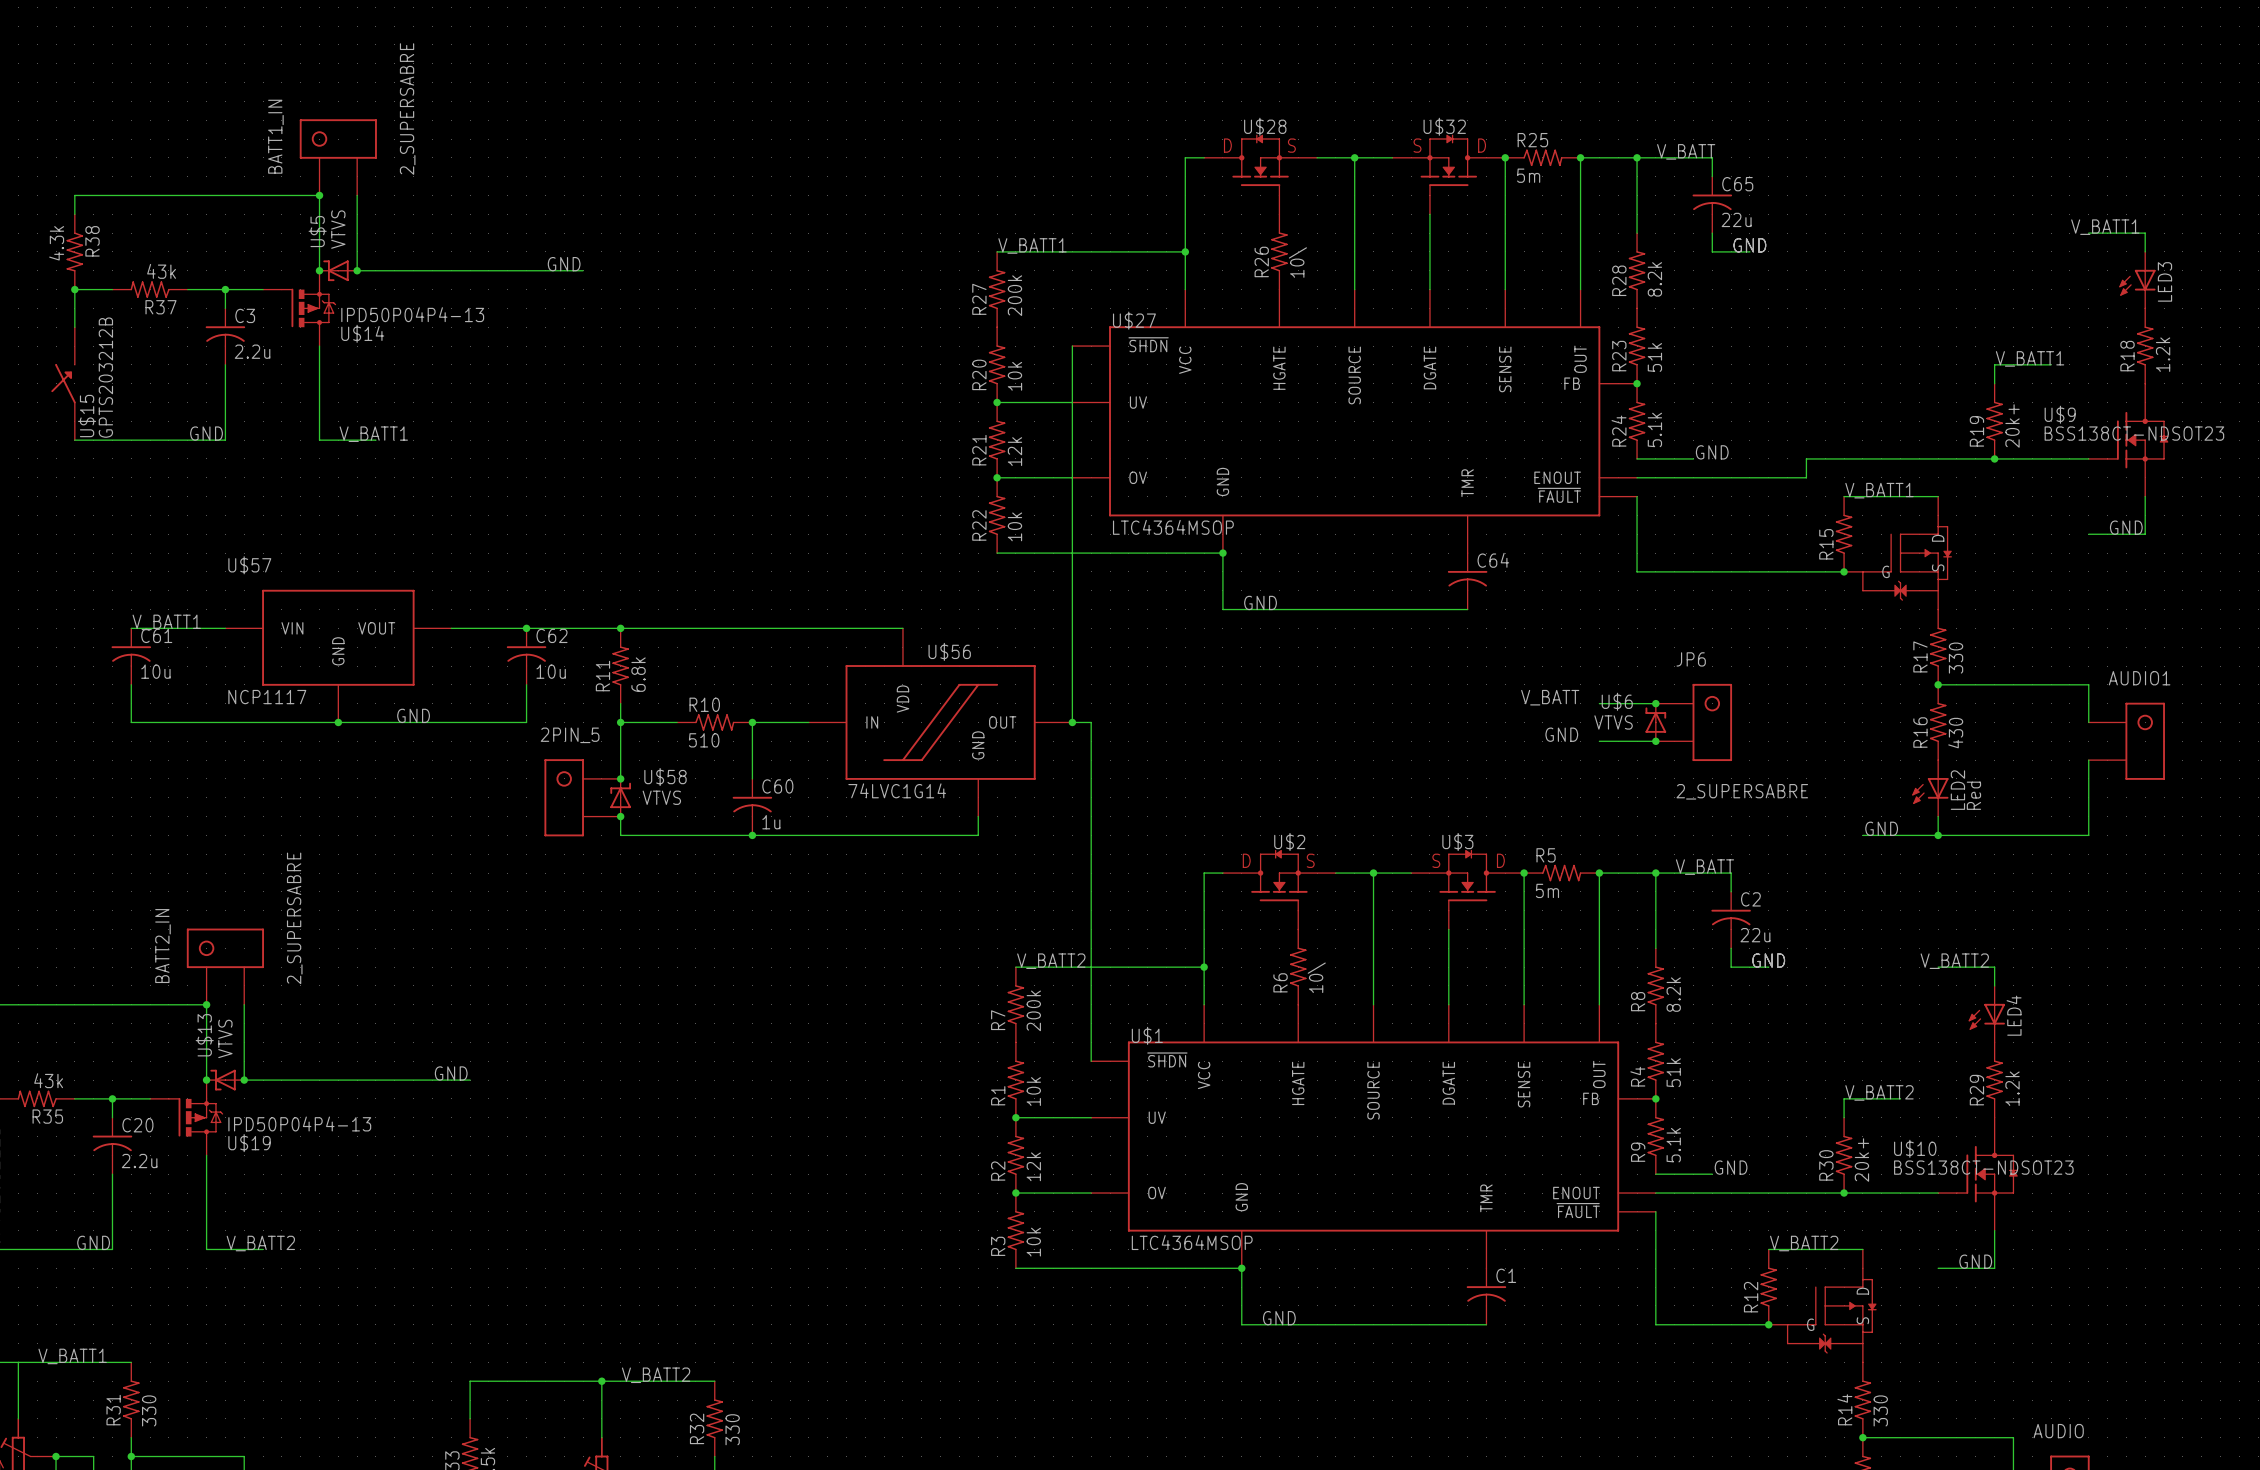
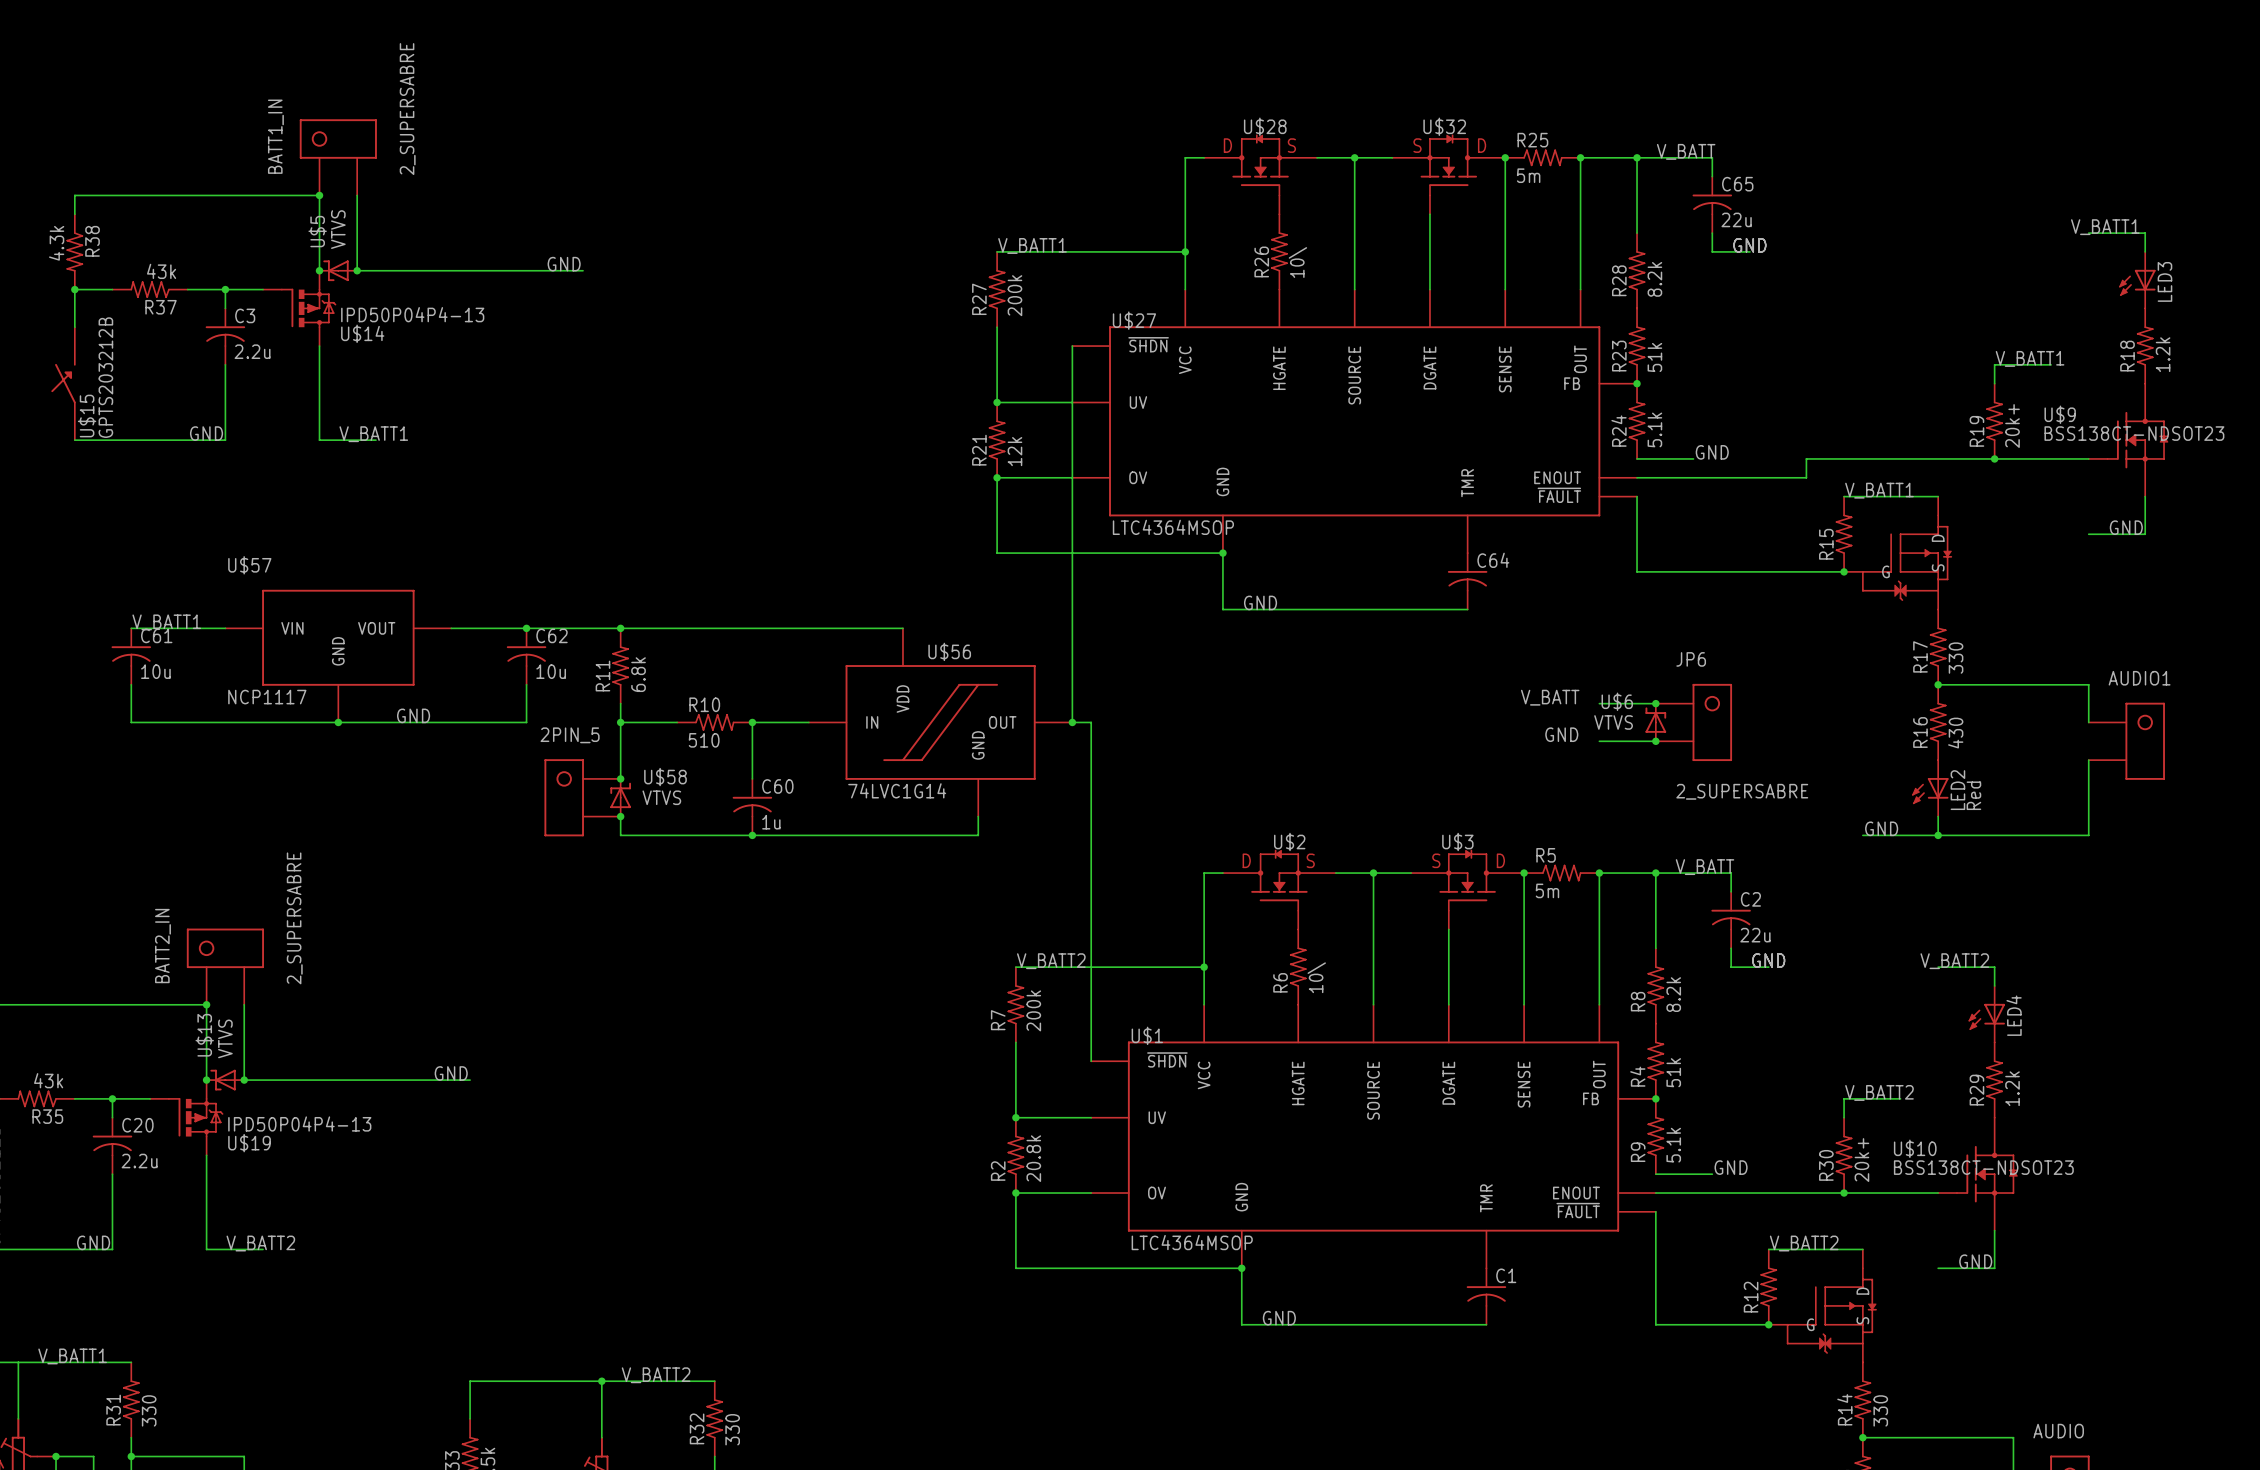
R20: 10k (997, 364) -> none
R22: 10k (997, 515) -> none
R1: 10k (1015, 1080) -> none
R2 value: 12k (1033, 1166) -> 20.8k (1033, 1158)
R3: 10k (1015, 1230) -> none

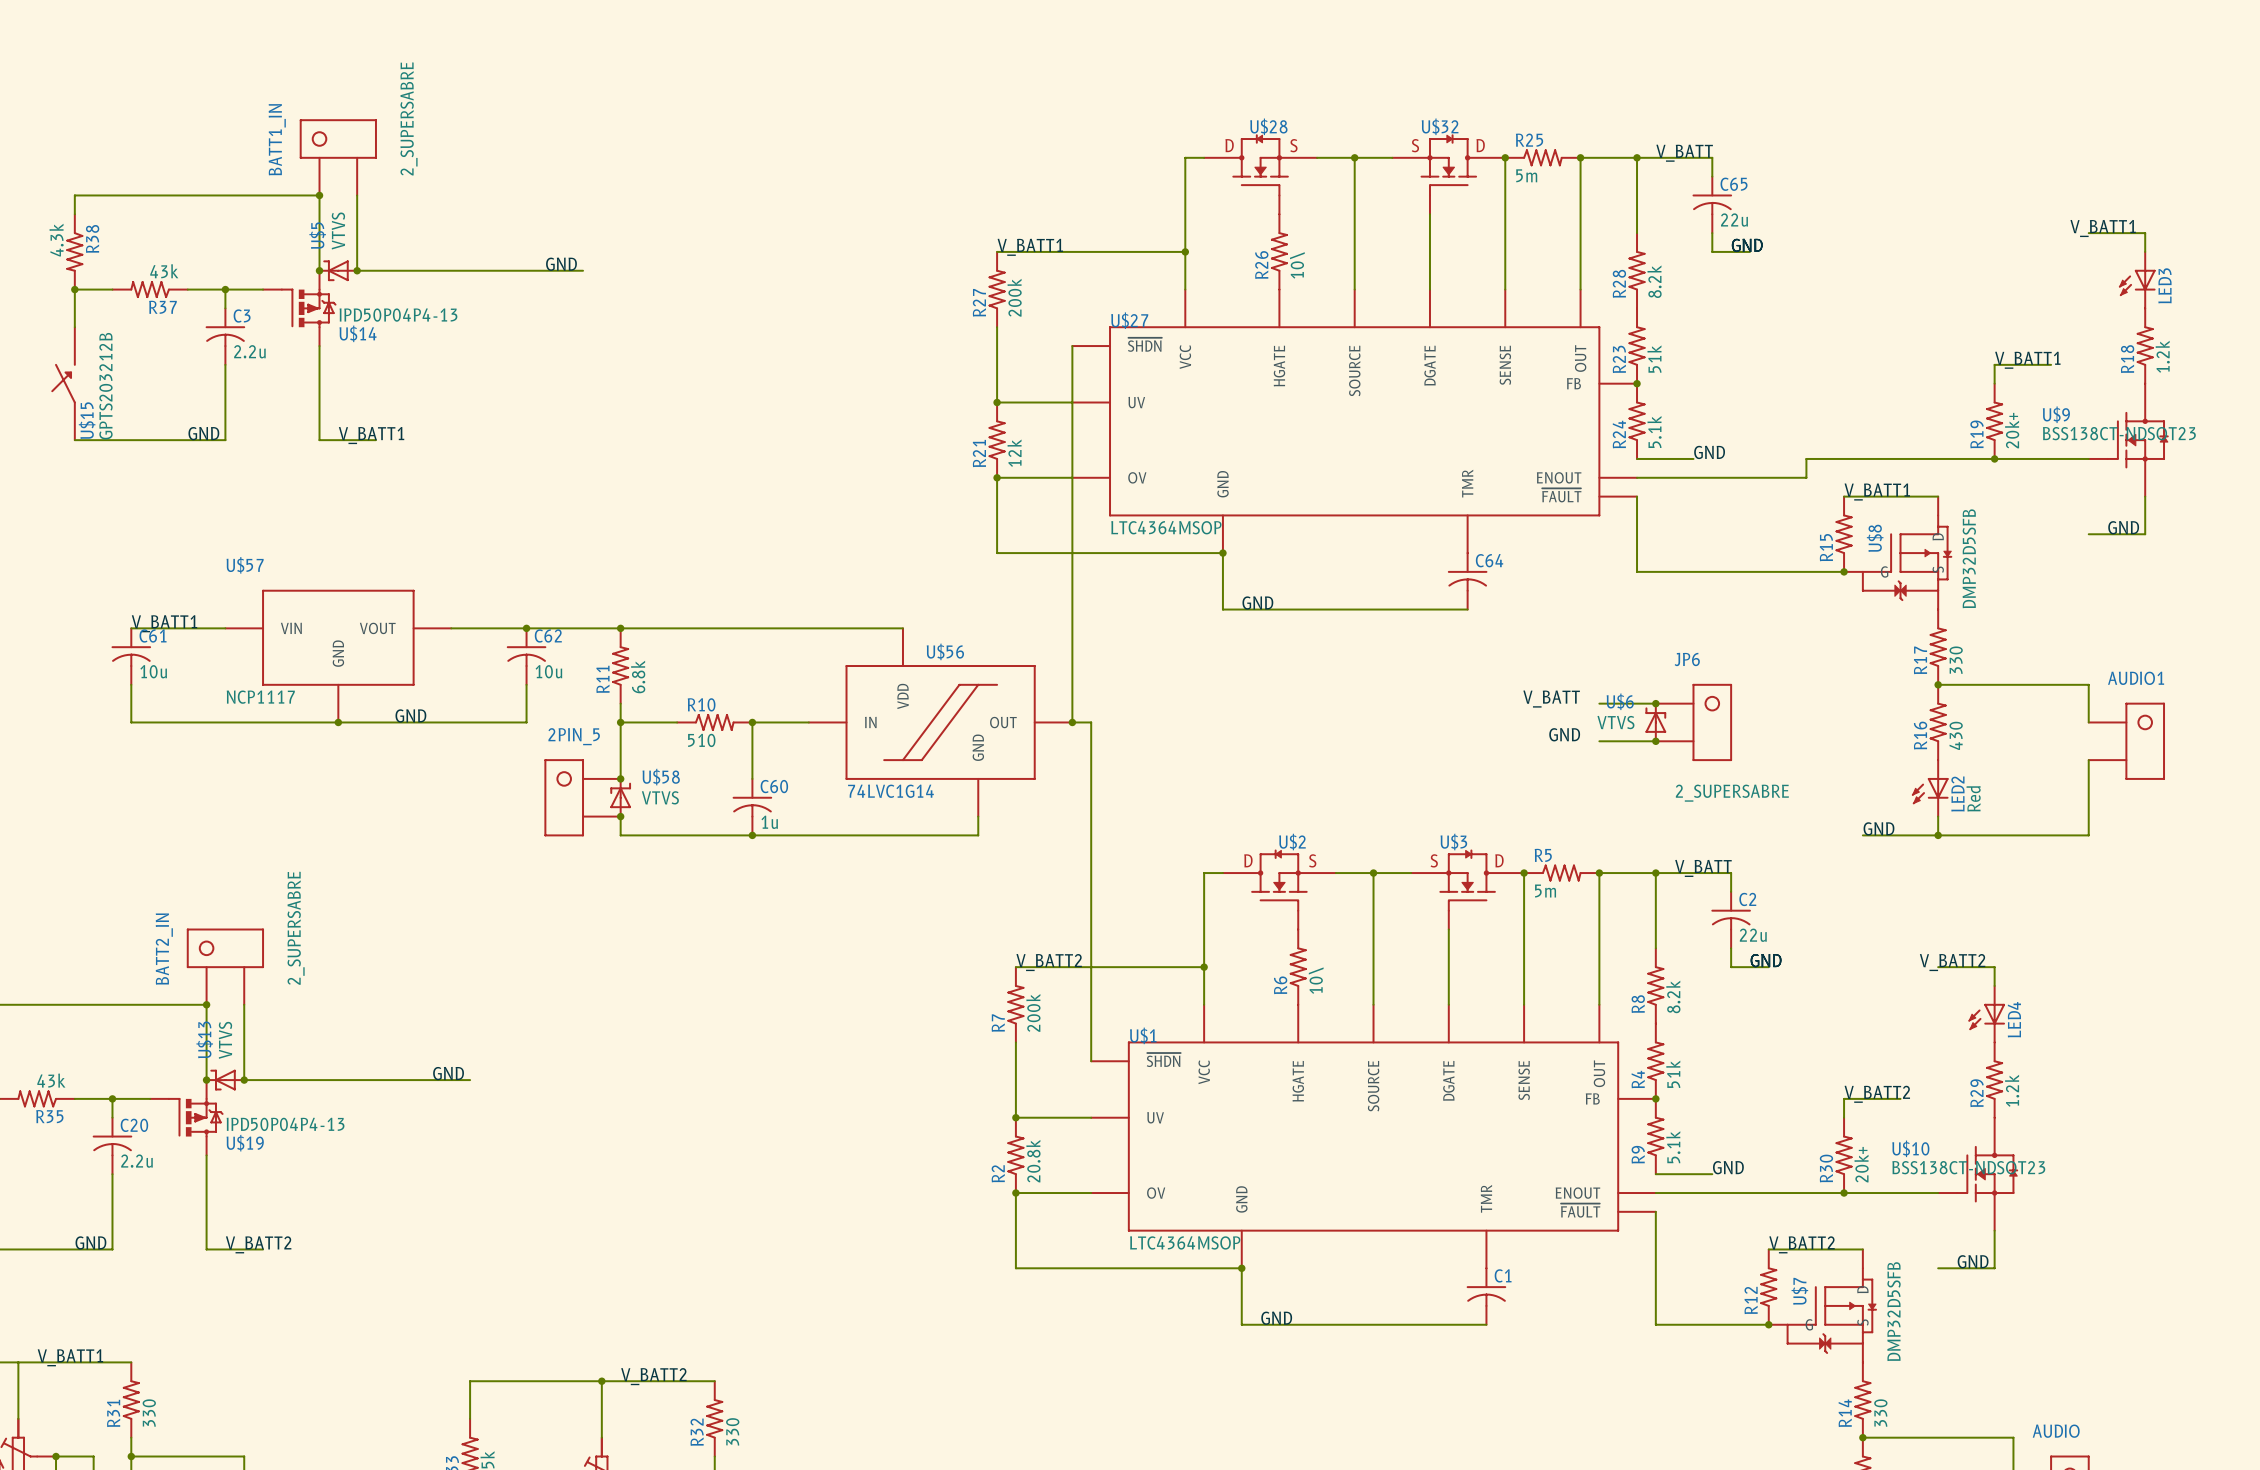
U$8 name: none -> U$8 (1875, 538)
U$8 value: none -> DMP32D5SFB (1969, 558)
U$7 name: none -> U$7 (1799, 1291)
U$7 value: none -> DMP32D5SFB (1894, 1311)

